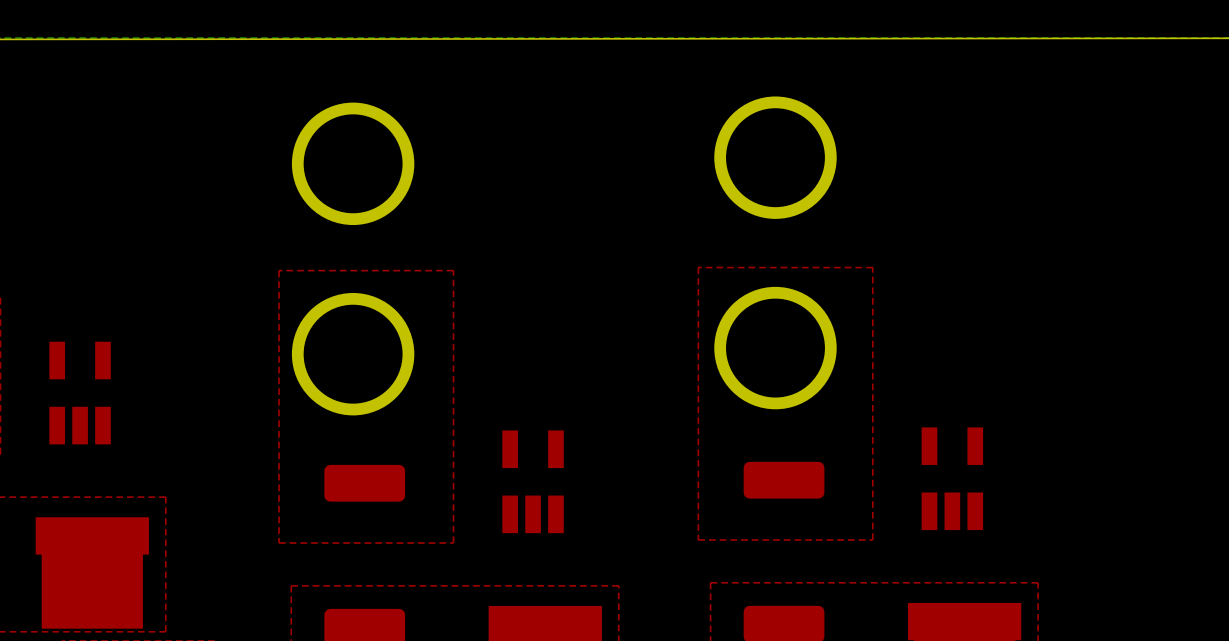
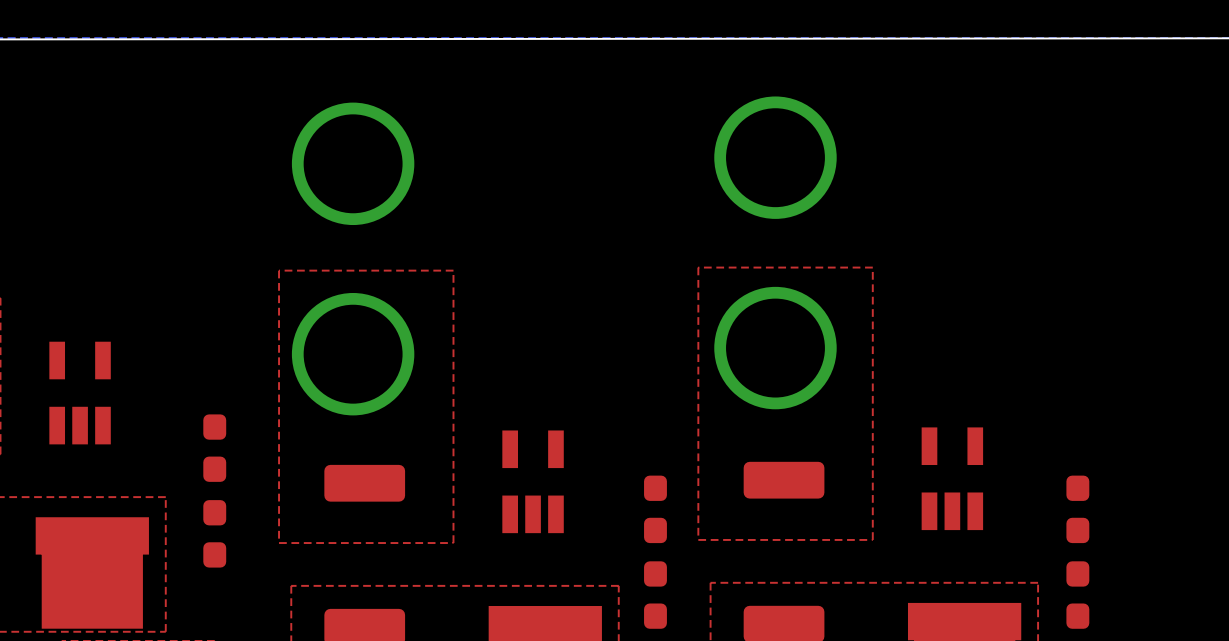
part: none -> (214, 448)
part: none -> (655, 509)
part: none -> (1077, 509)
part: none -> (214, 533)
part: none -> (655, 595)
part: none -> (1077, 595)

